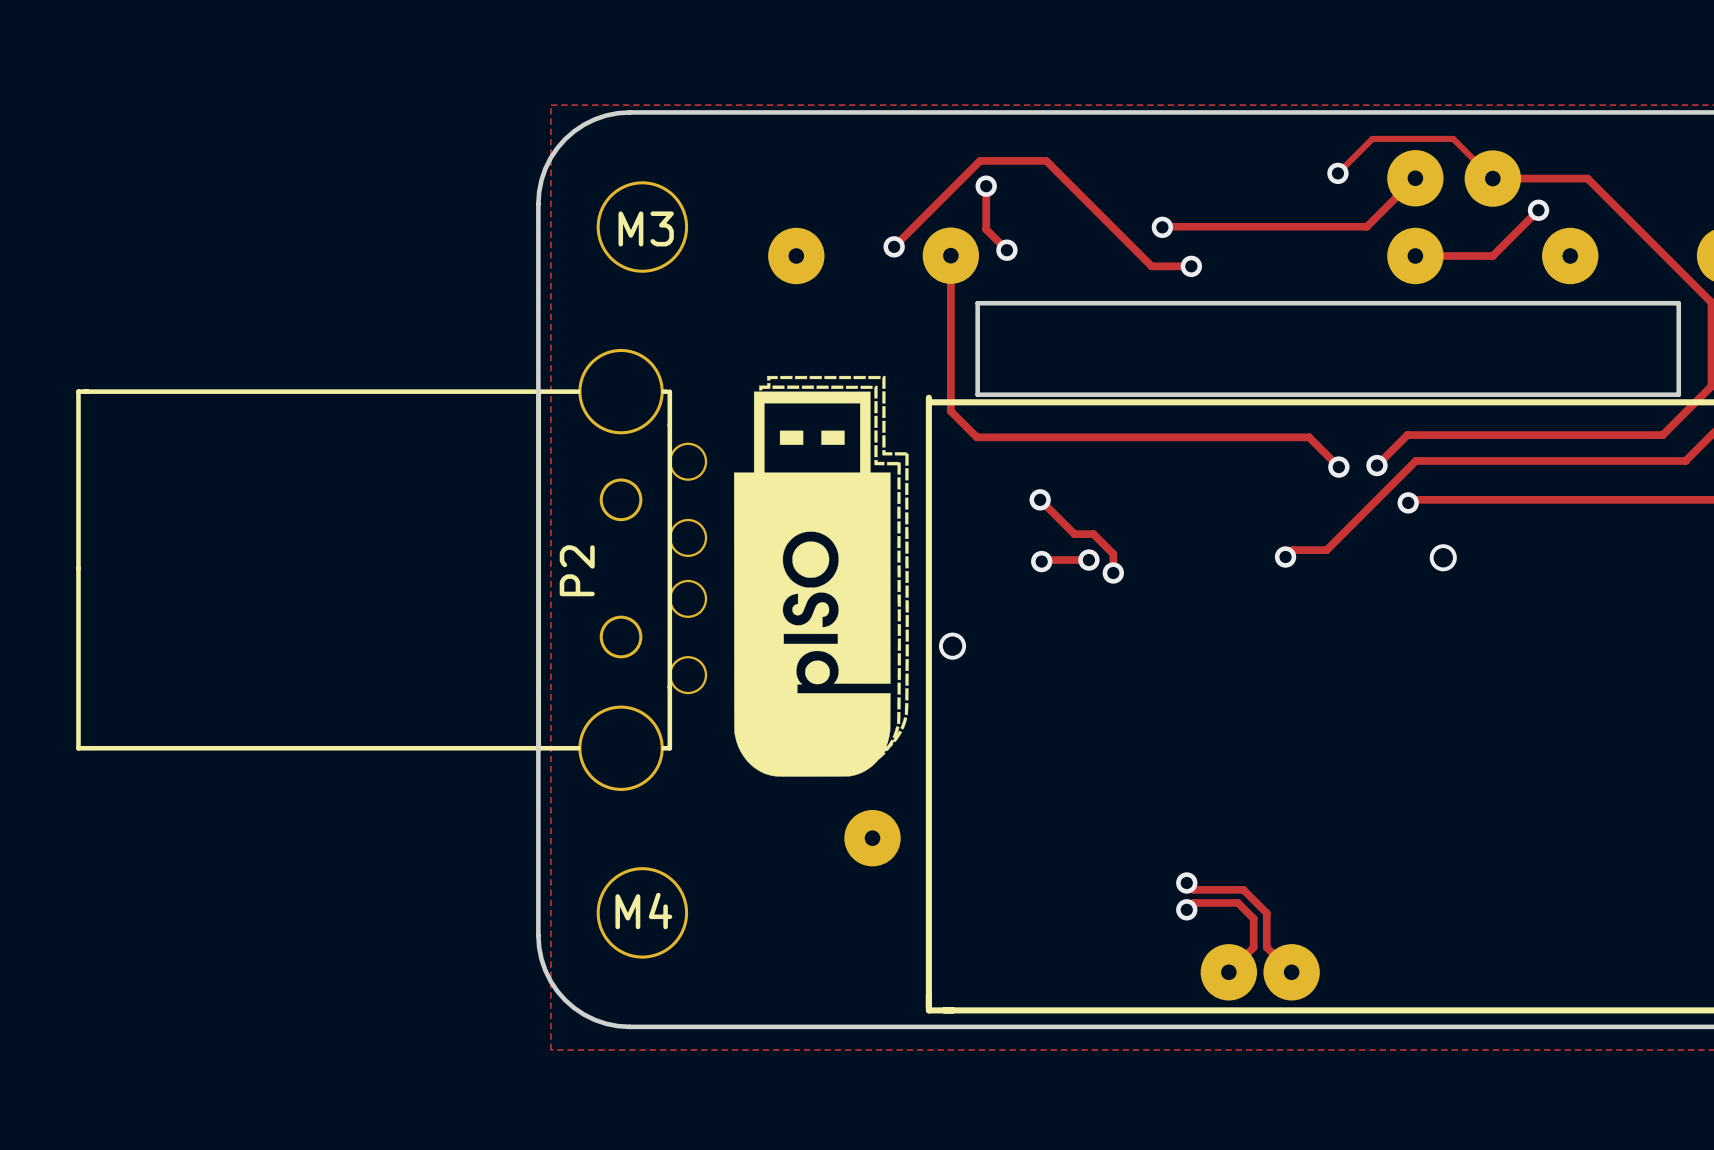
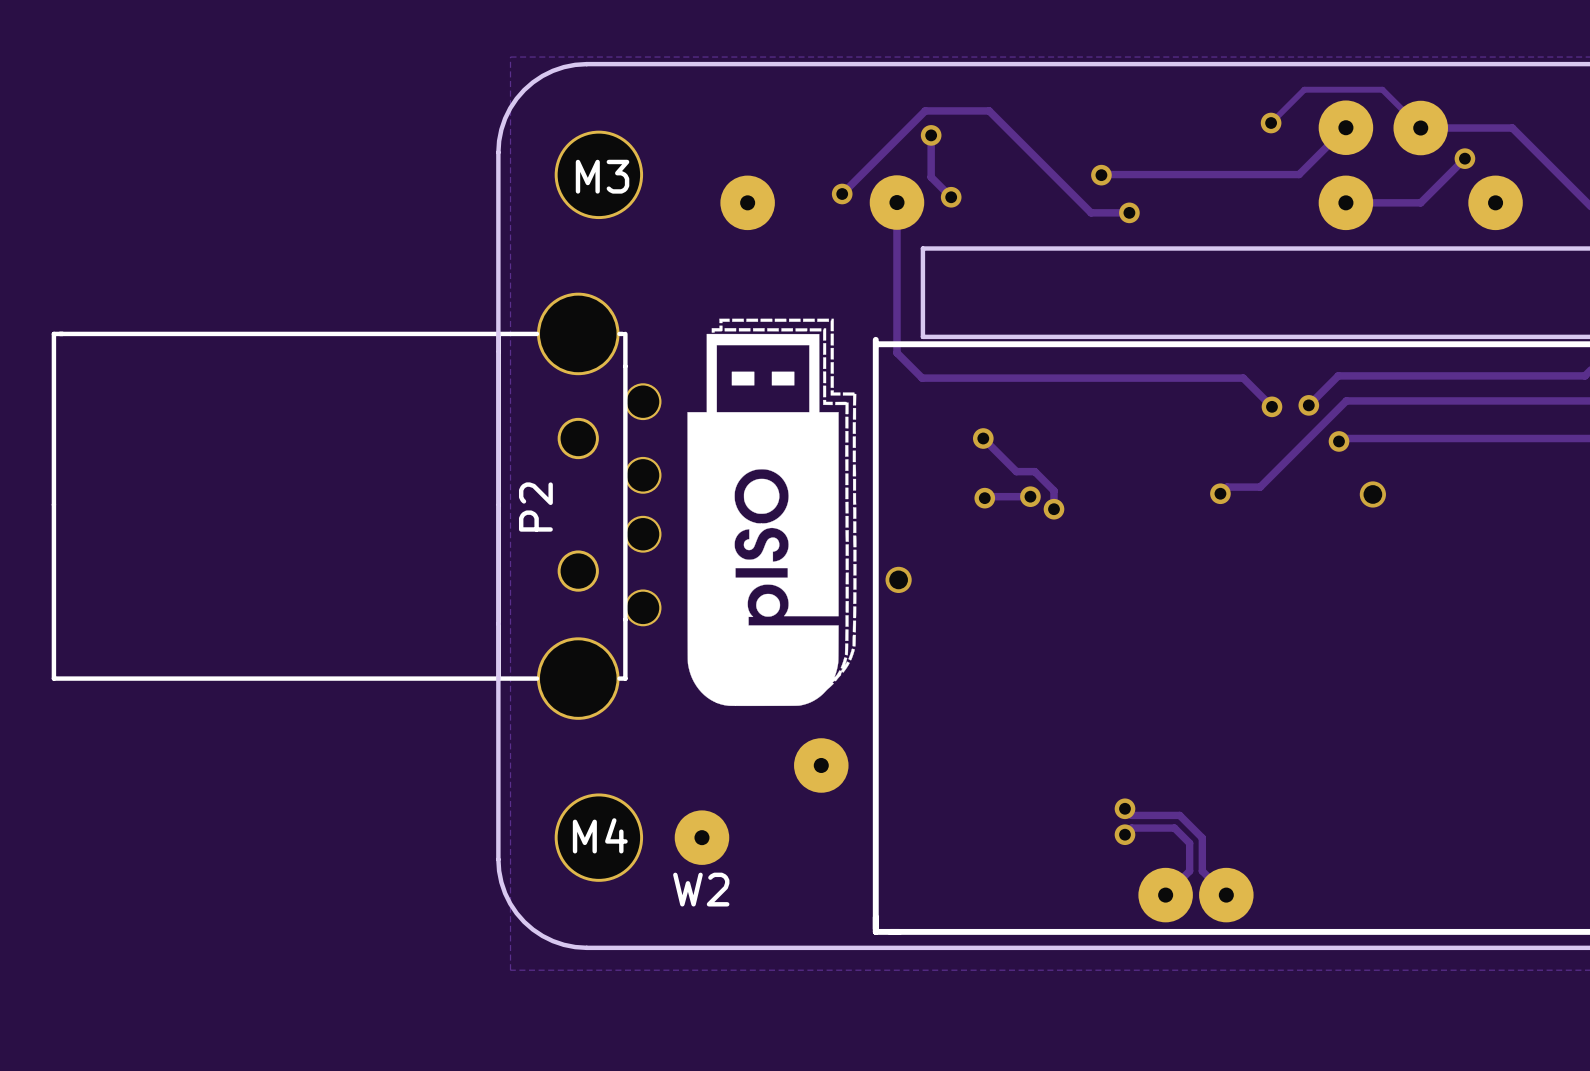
W2: none -> (701, 837)

